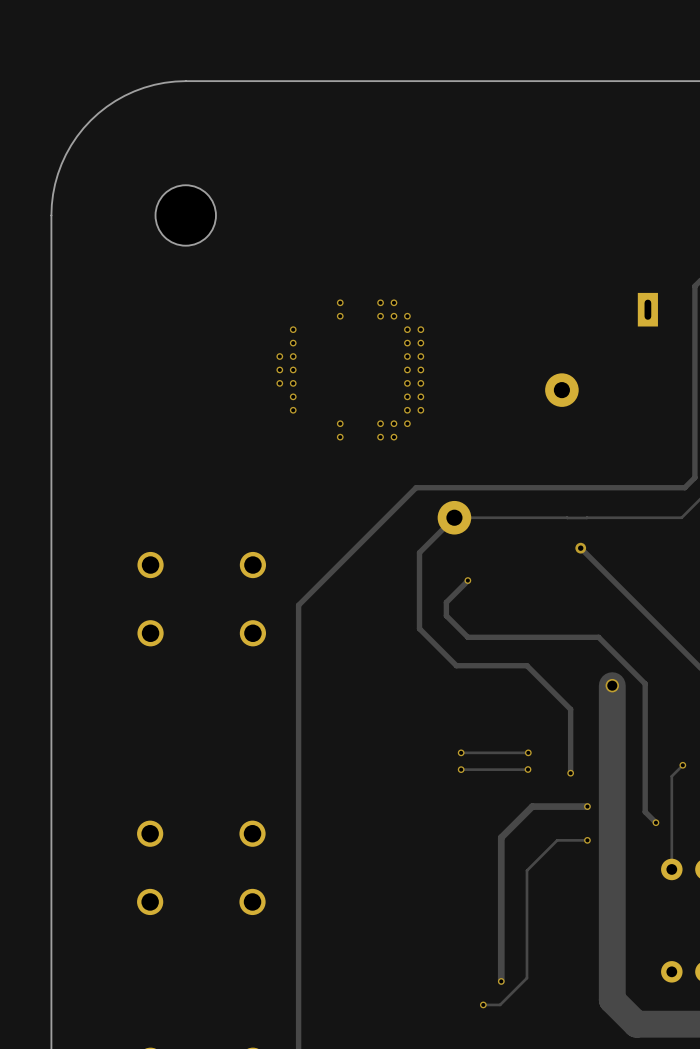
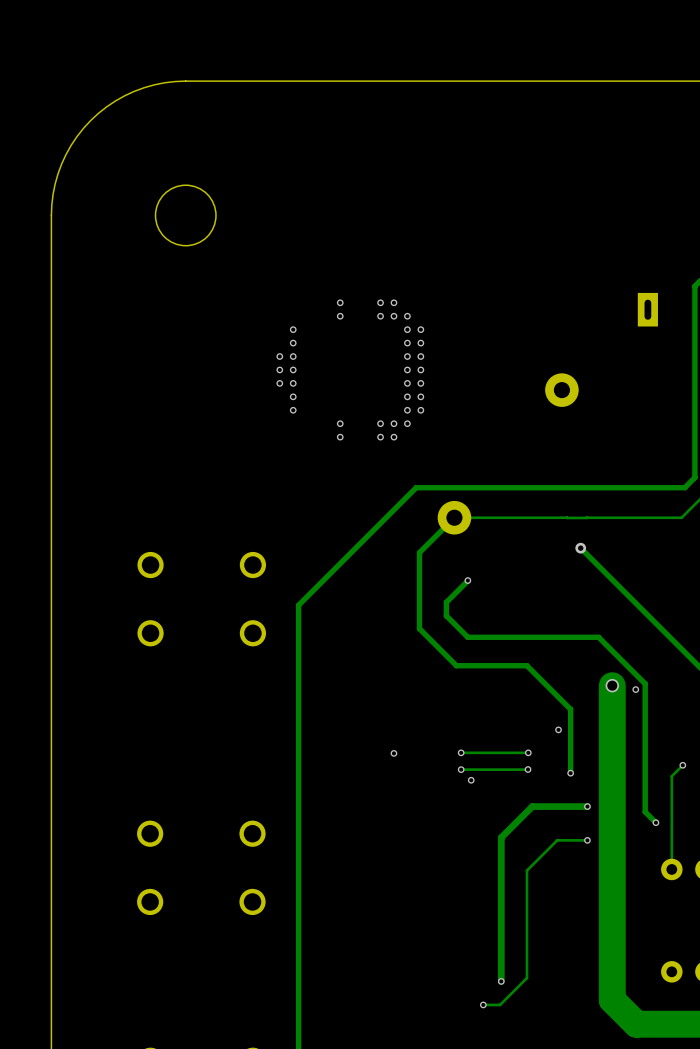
via: none -> (635, 689)
via: none -> (558, 729)
via: none -> (393, 753)
via: none -> (471, 780)

